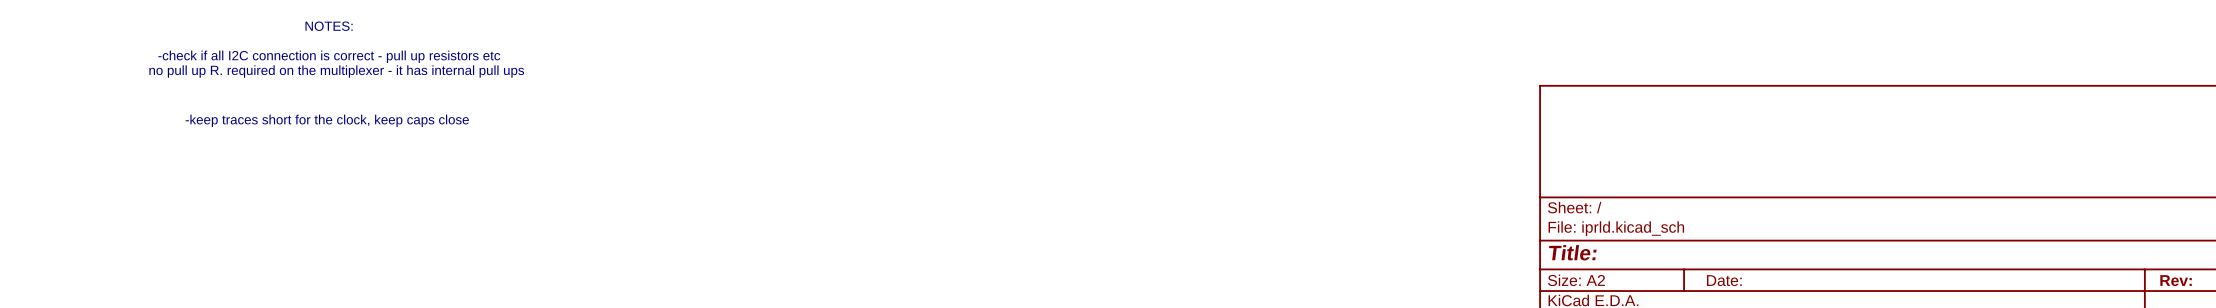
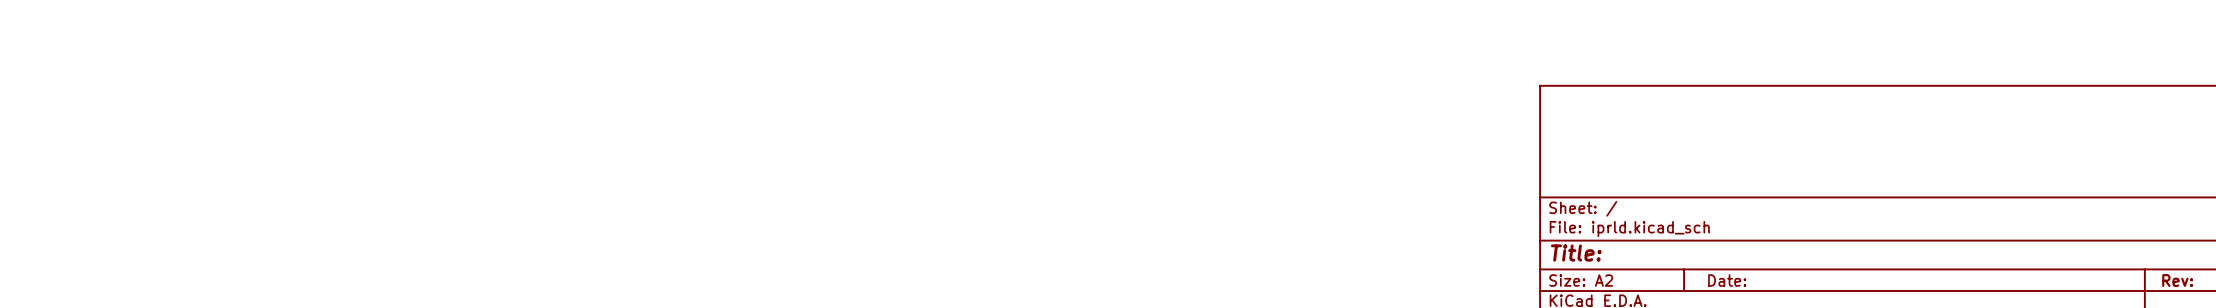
text: NOTES: (329, 26) -> none
text: -check if all I2C connection is correct - pull up resistors etc (329, 56) -> none
text: no pull up R. required on the multiplexer - it has internal pull ups (336, 71) -> none
text: -keep traces short for the clock, keep caps close (327, 120) -> none

